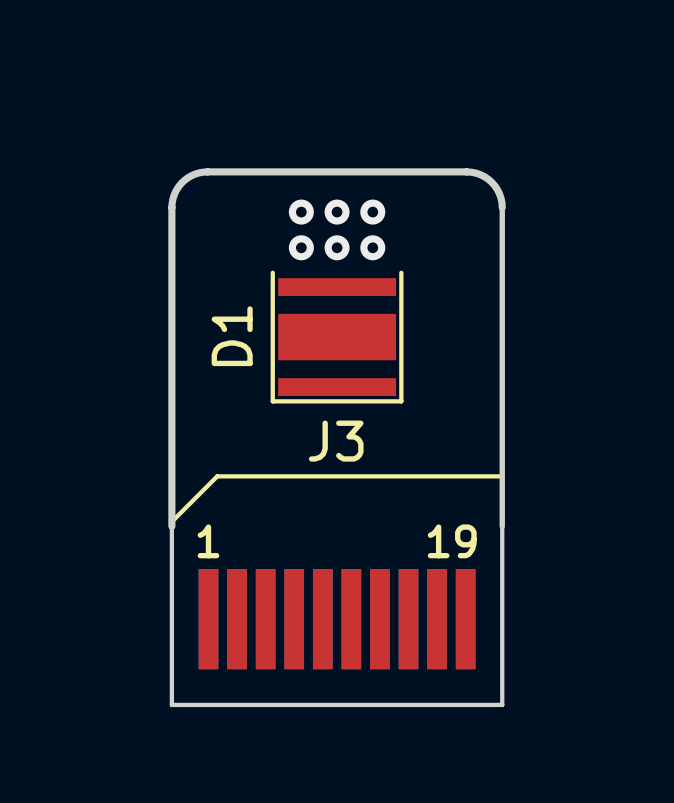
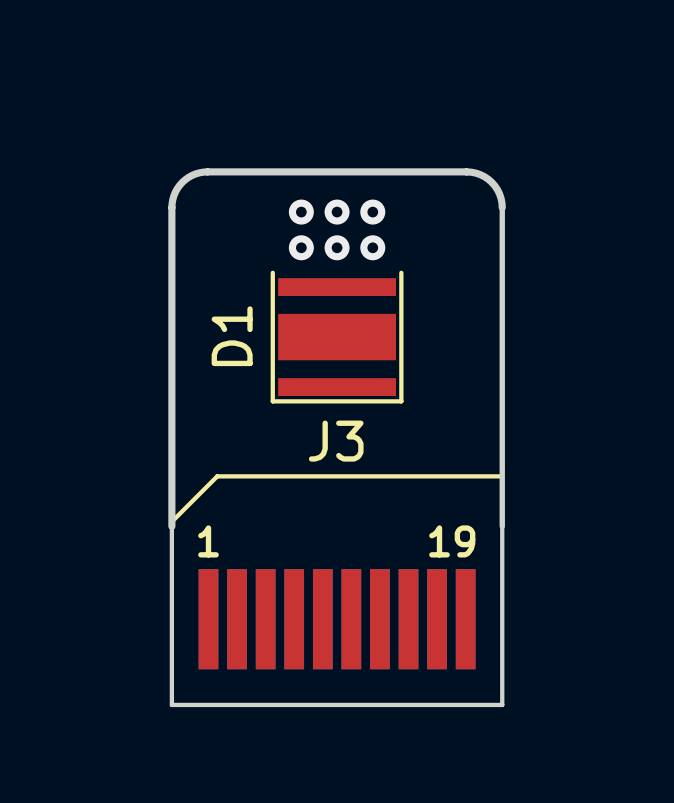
J3 footprint: [169, 474, 505, 708] -> [169, 474, 505, 708]

